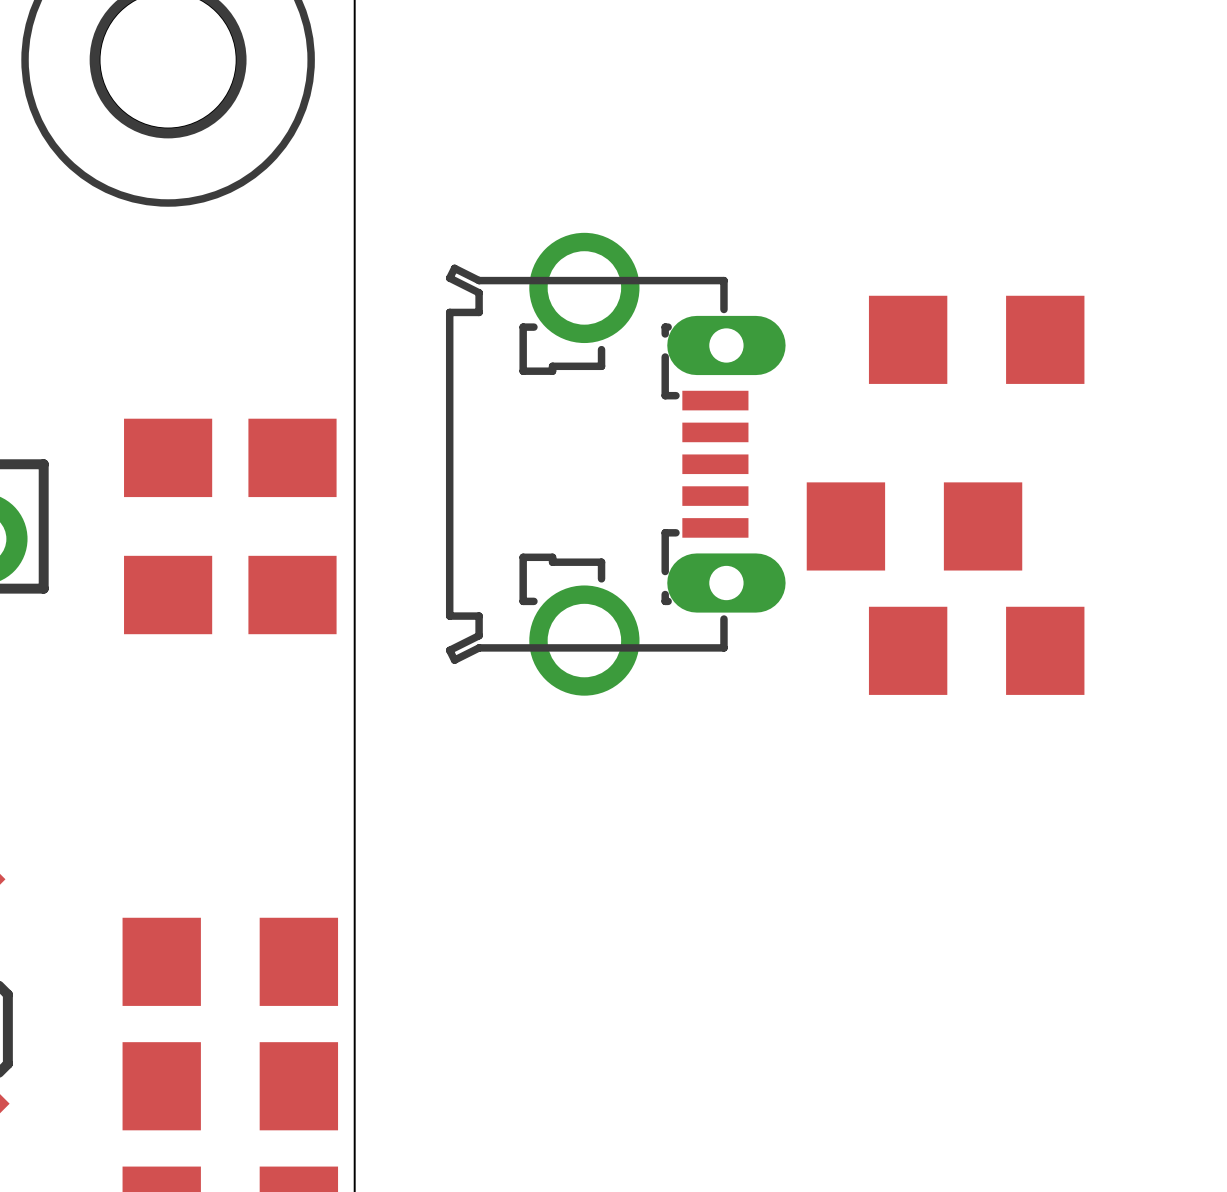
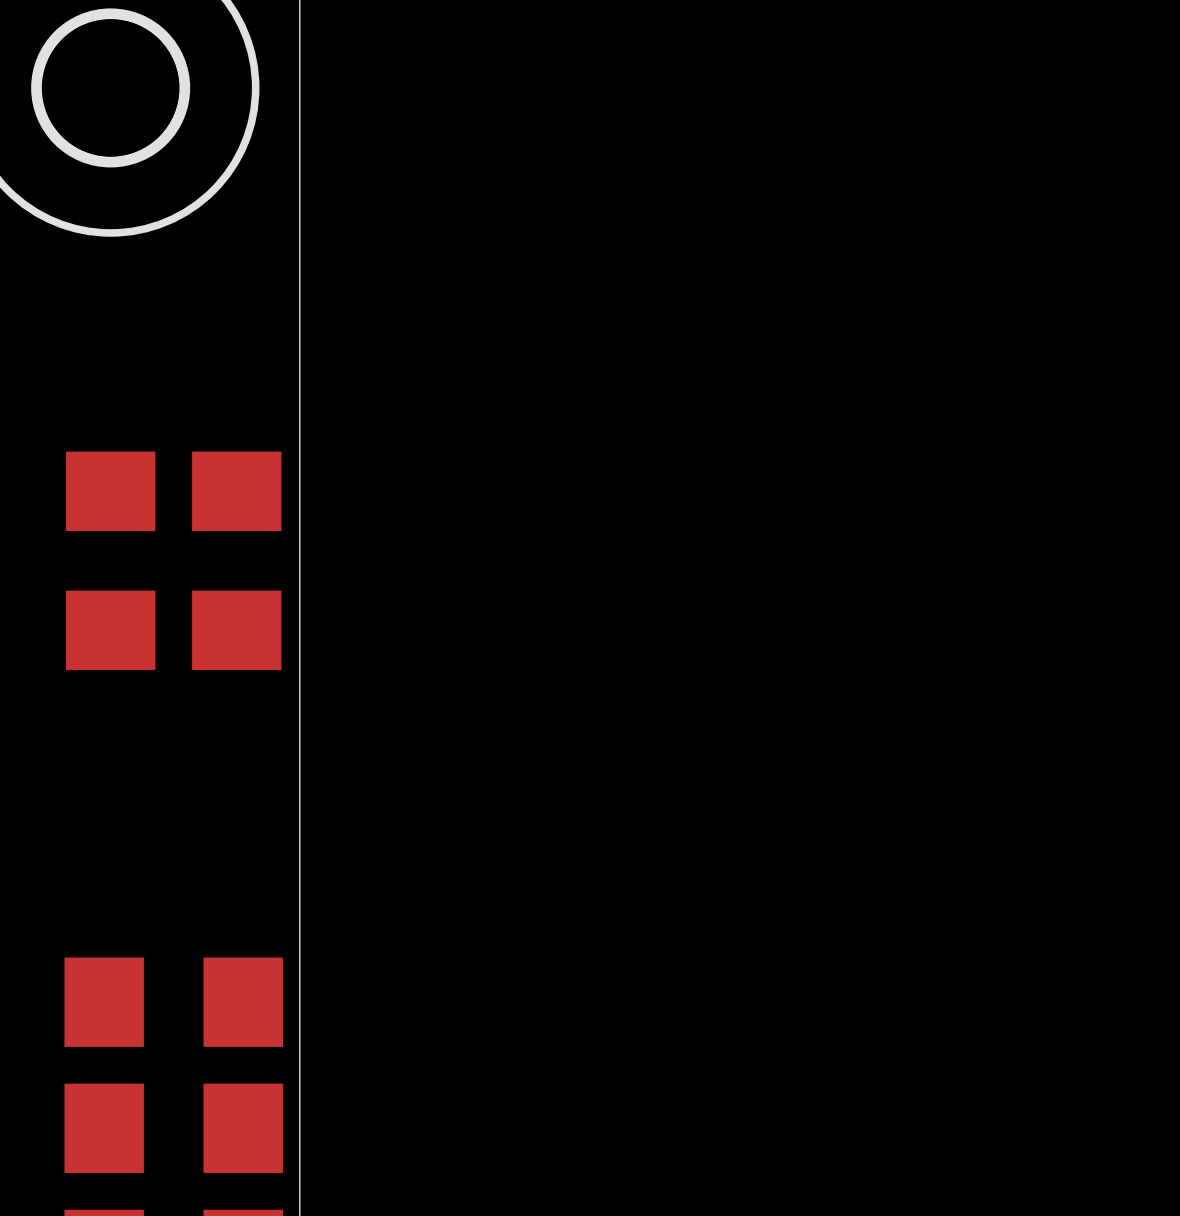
part: (976, 339) -> none
part: (615, 464) -> none
part: (914, 526) -> none
part: (976, 650) -> none

